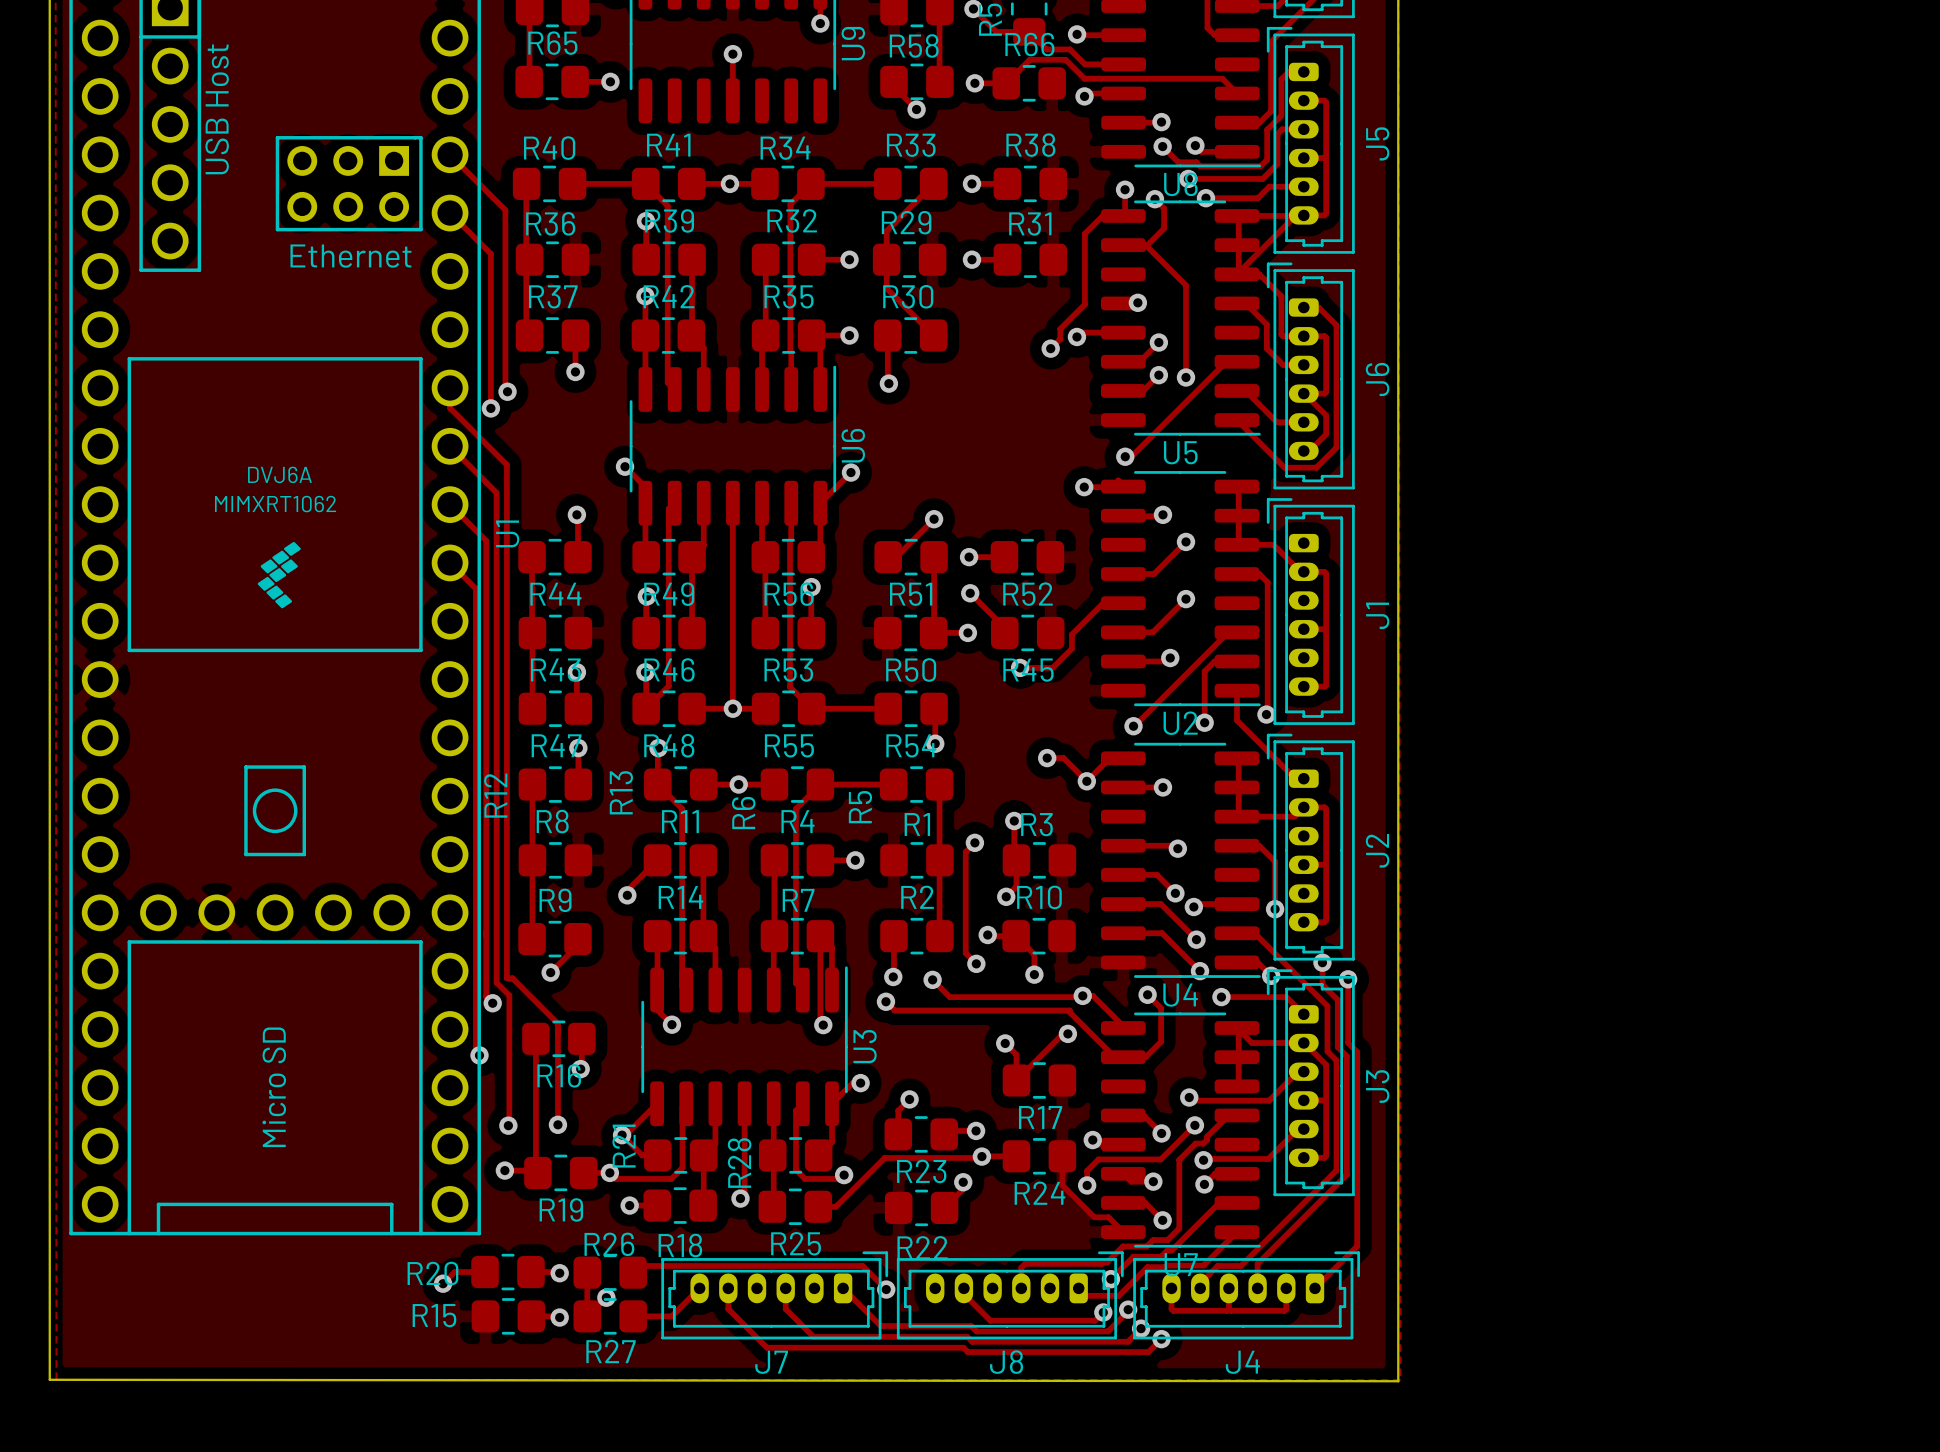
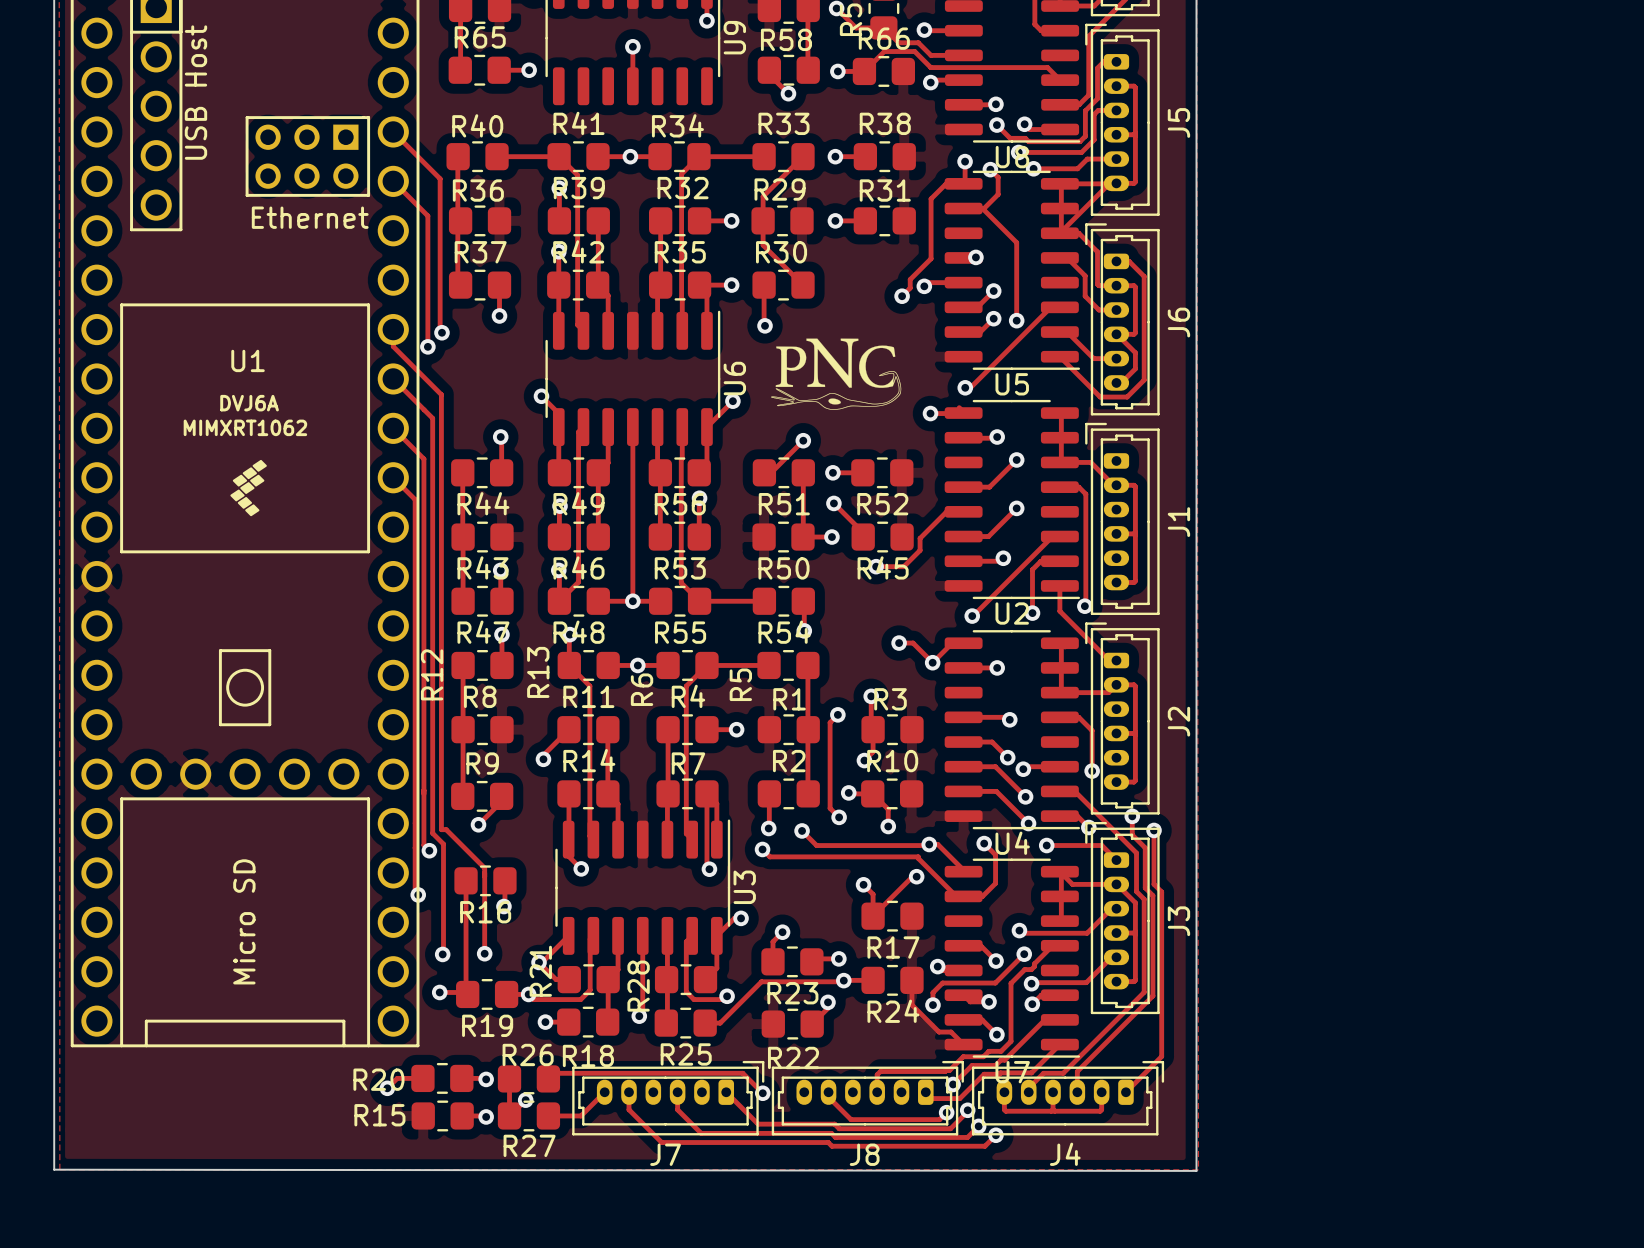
drawing: none -> [771, 338, 902, 410]
U1 name rotation: 0° (507, 533) -> 90° clockwise (248, 360)
U1 name position: U1 (507, 533) -> U1 (248, 360)

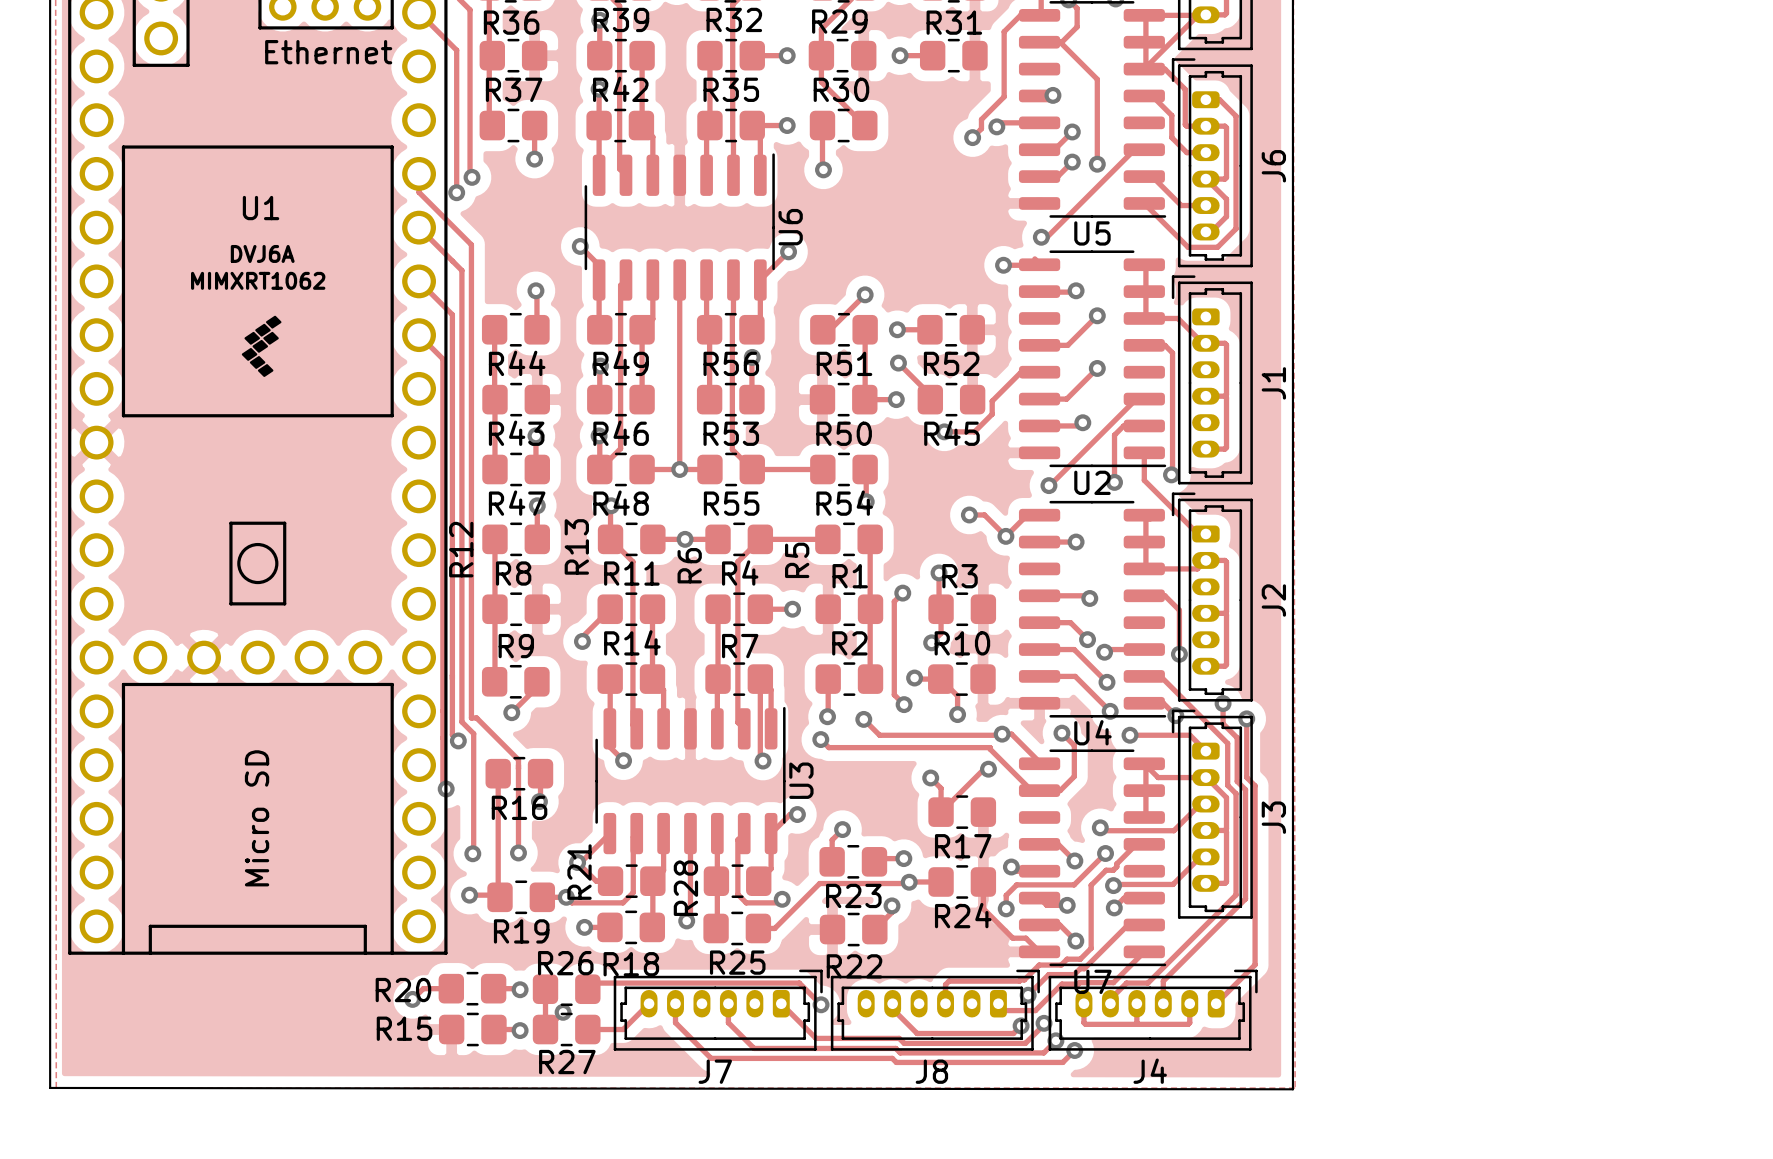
drawing: [771, 338, 902, 410] -> none

